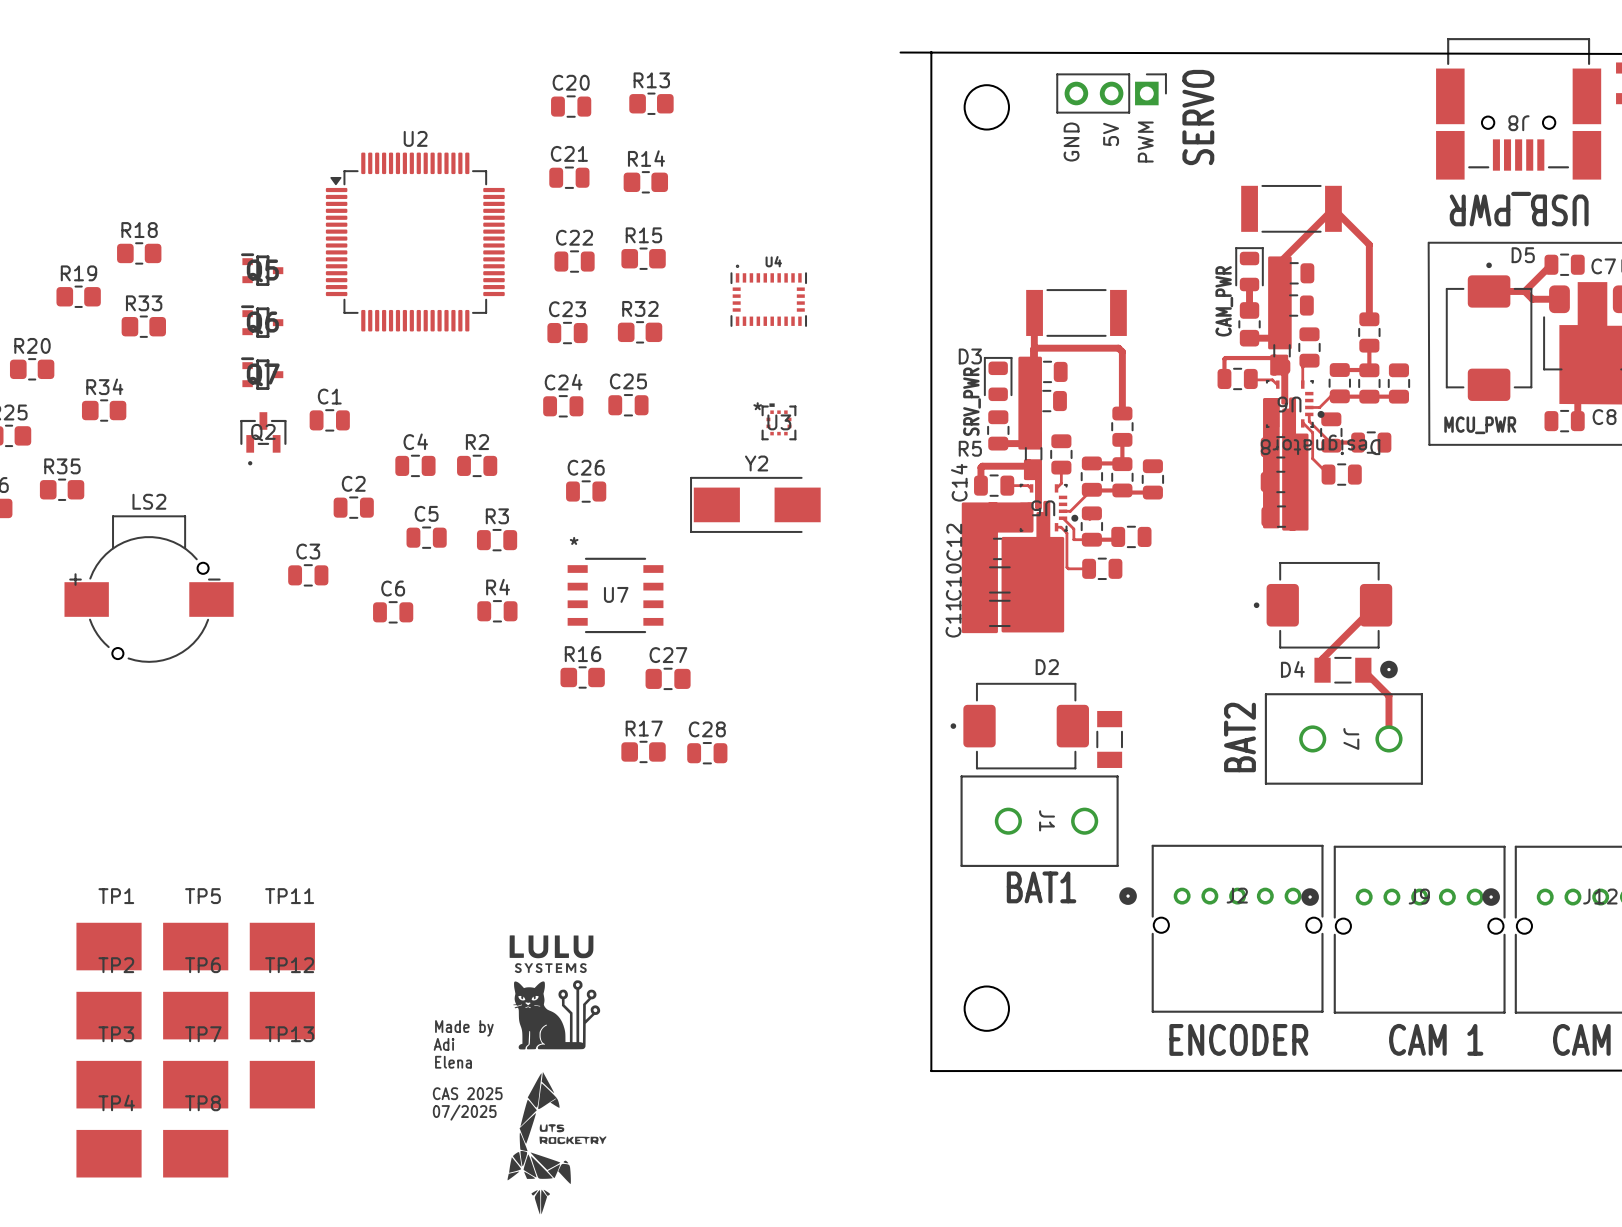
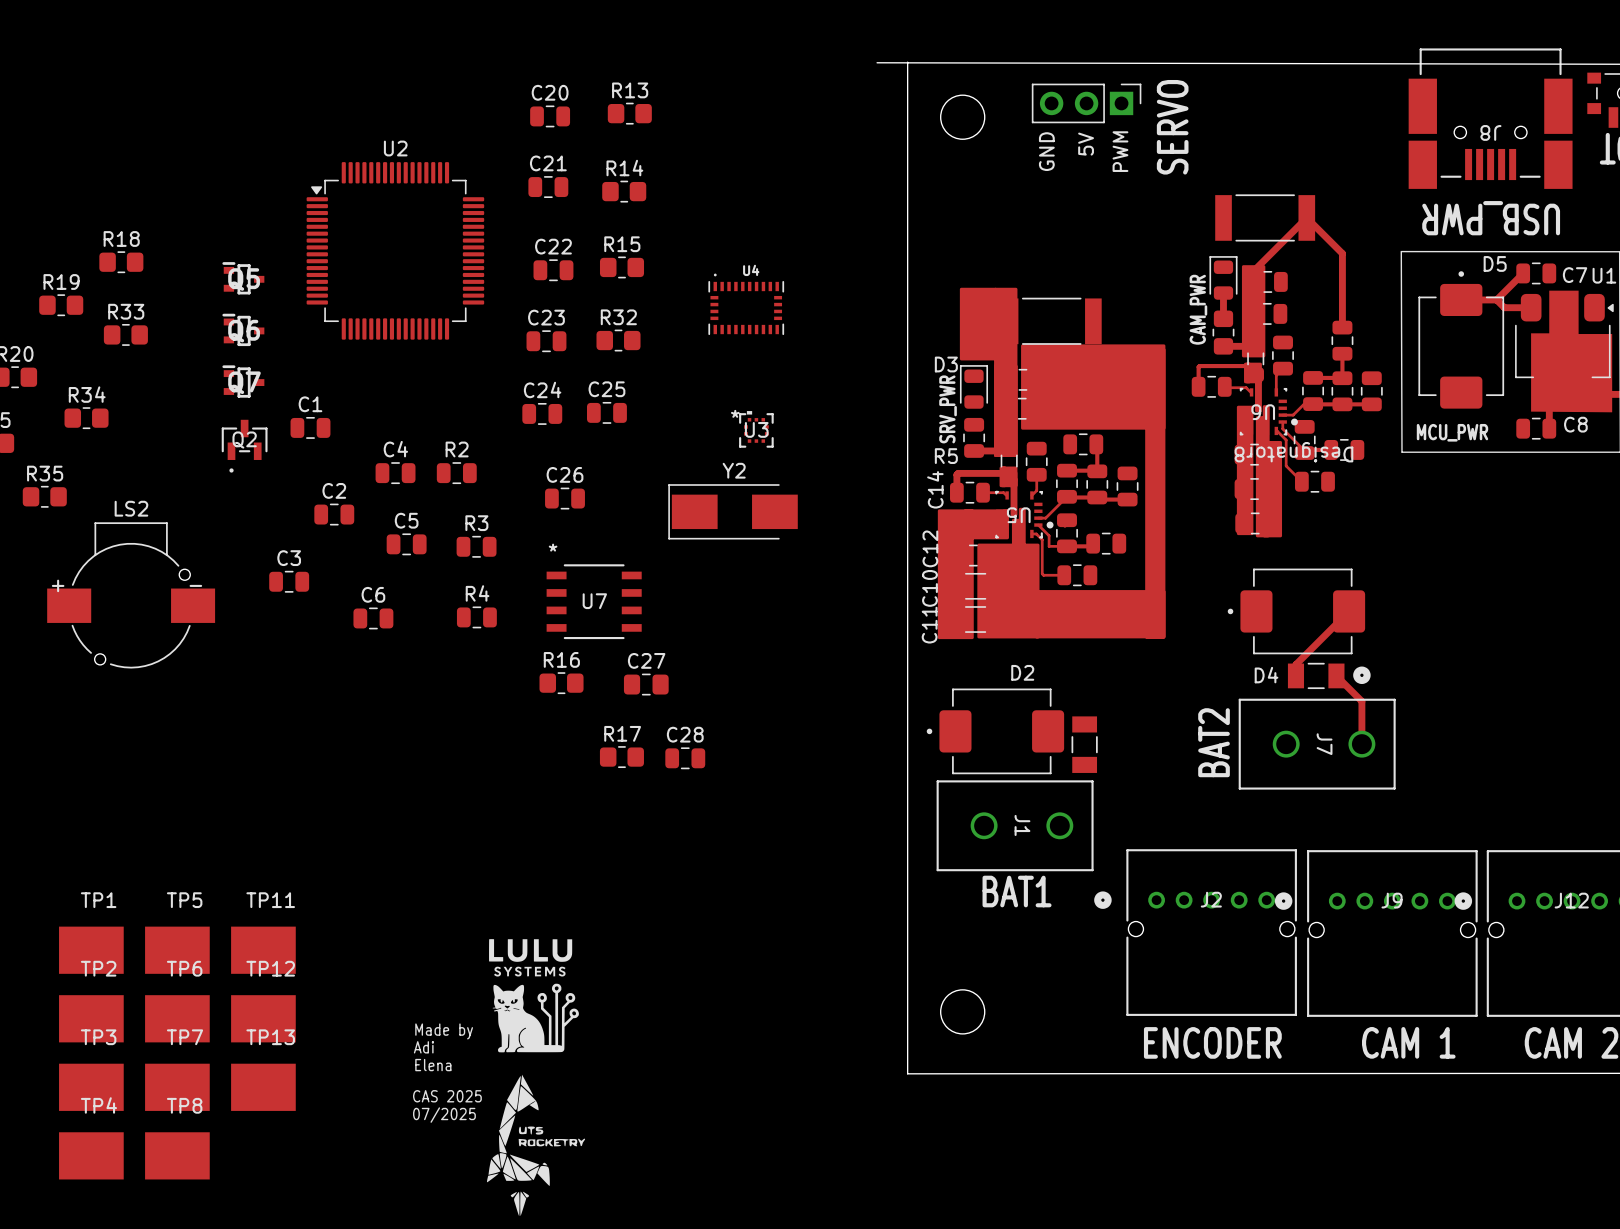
drawing: none -> [959, 287, 1166, 639]
top track: (1033, 401) (1034, 348) (1118, 348) (1122, 351) (1122, 413) -> none
part rotation: 0° (1122, 426) -> 90° clockwise (1083, 444)

